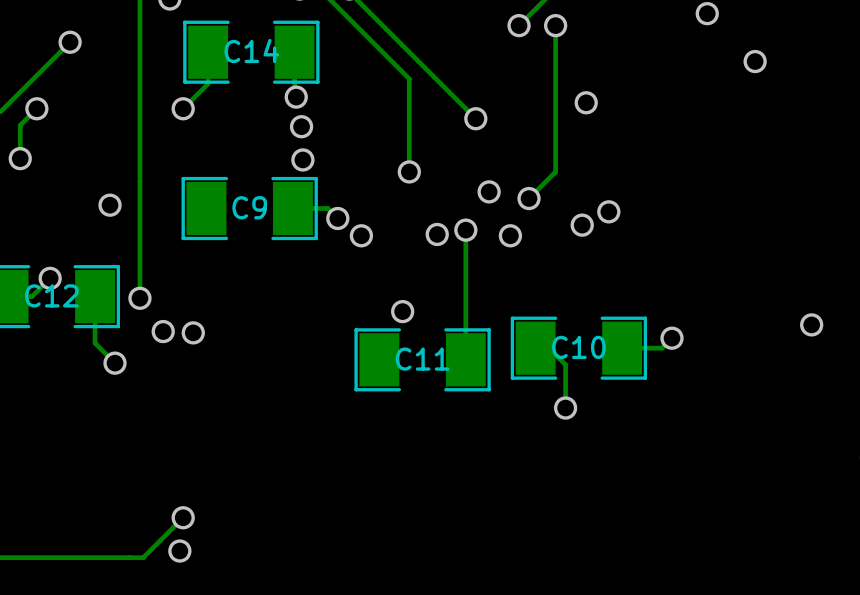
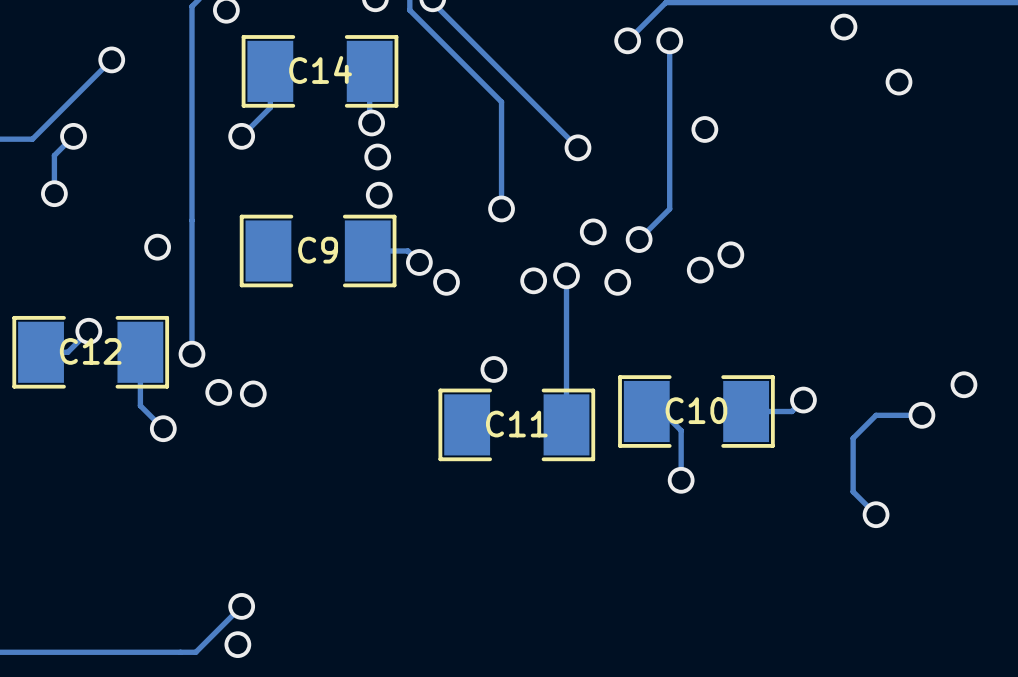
track: none -> (921, 415) (876, 415) (853, 438) (853, 491) (876, 514)
via: none -> (921, 415)
via: none -> (876, 514)

